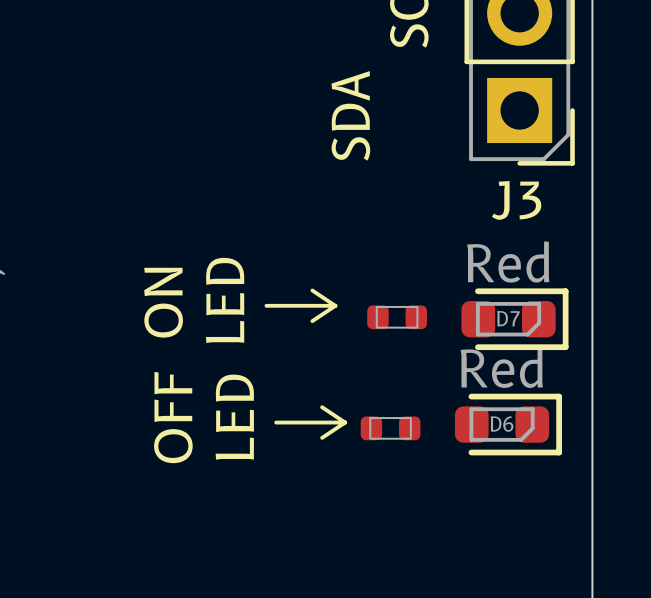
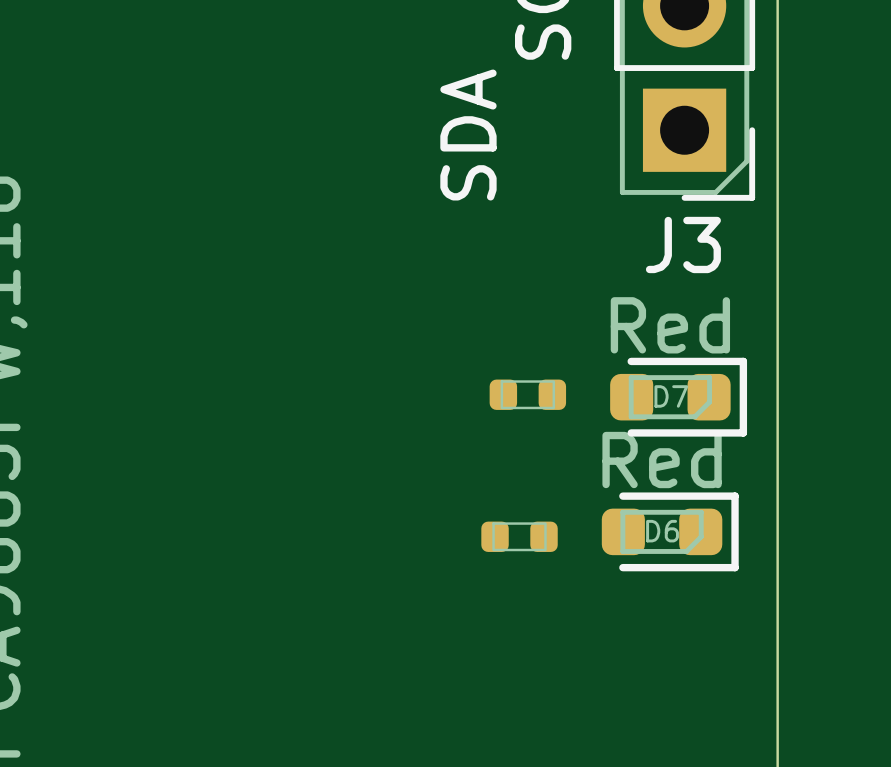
line: (312, 290) (335, 305) -> none
text: LED (225, 300) -> none
text: ON (163, 302) -> none
line: (266, 305) (335, 305) -> none
line: (335, 305) (312, 321) -> none
line: (322, 407) (345, 422) -> none
text: OFF (173, 417) -> none
text: LED (234, 417) -> none
line: (276, 422) (345, 422) -> none
line: (345, 422) (322, 437) -> none

